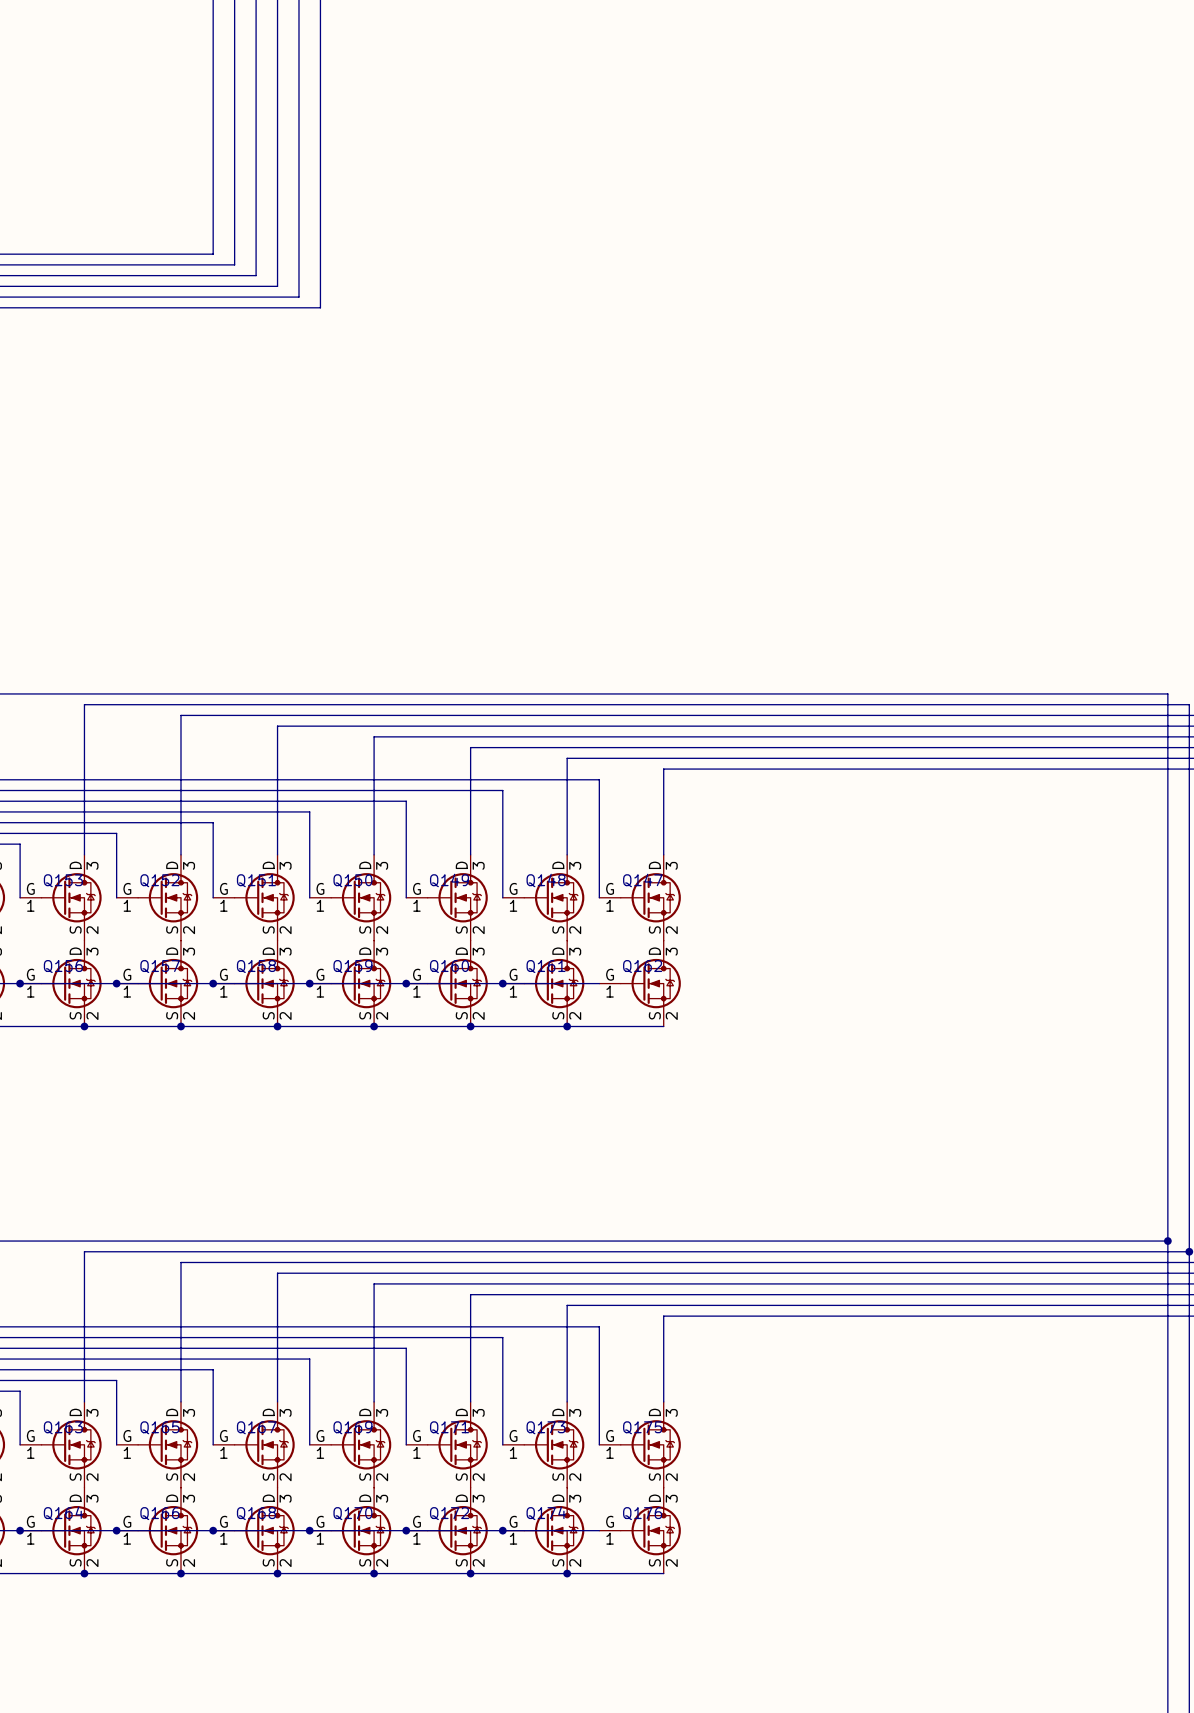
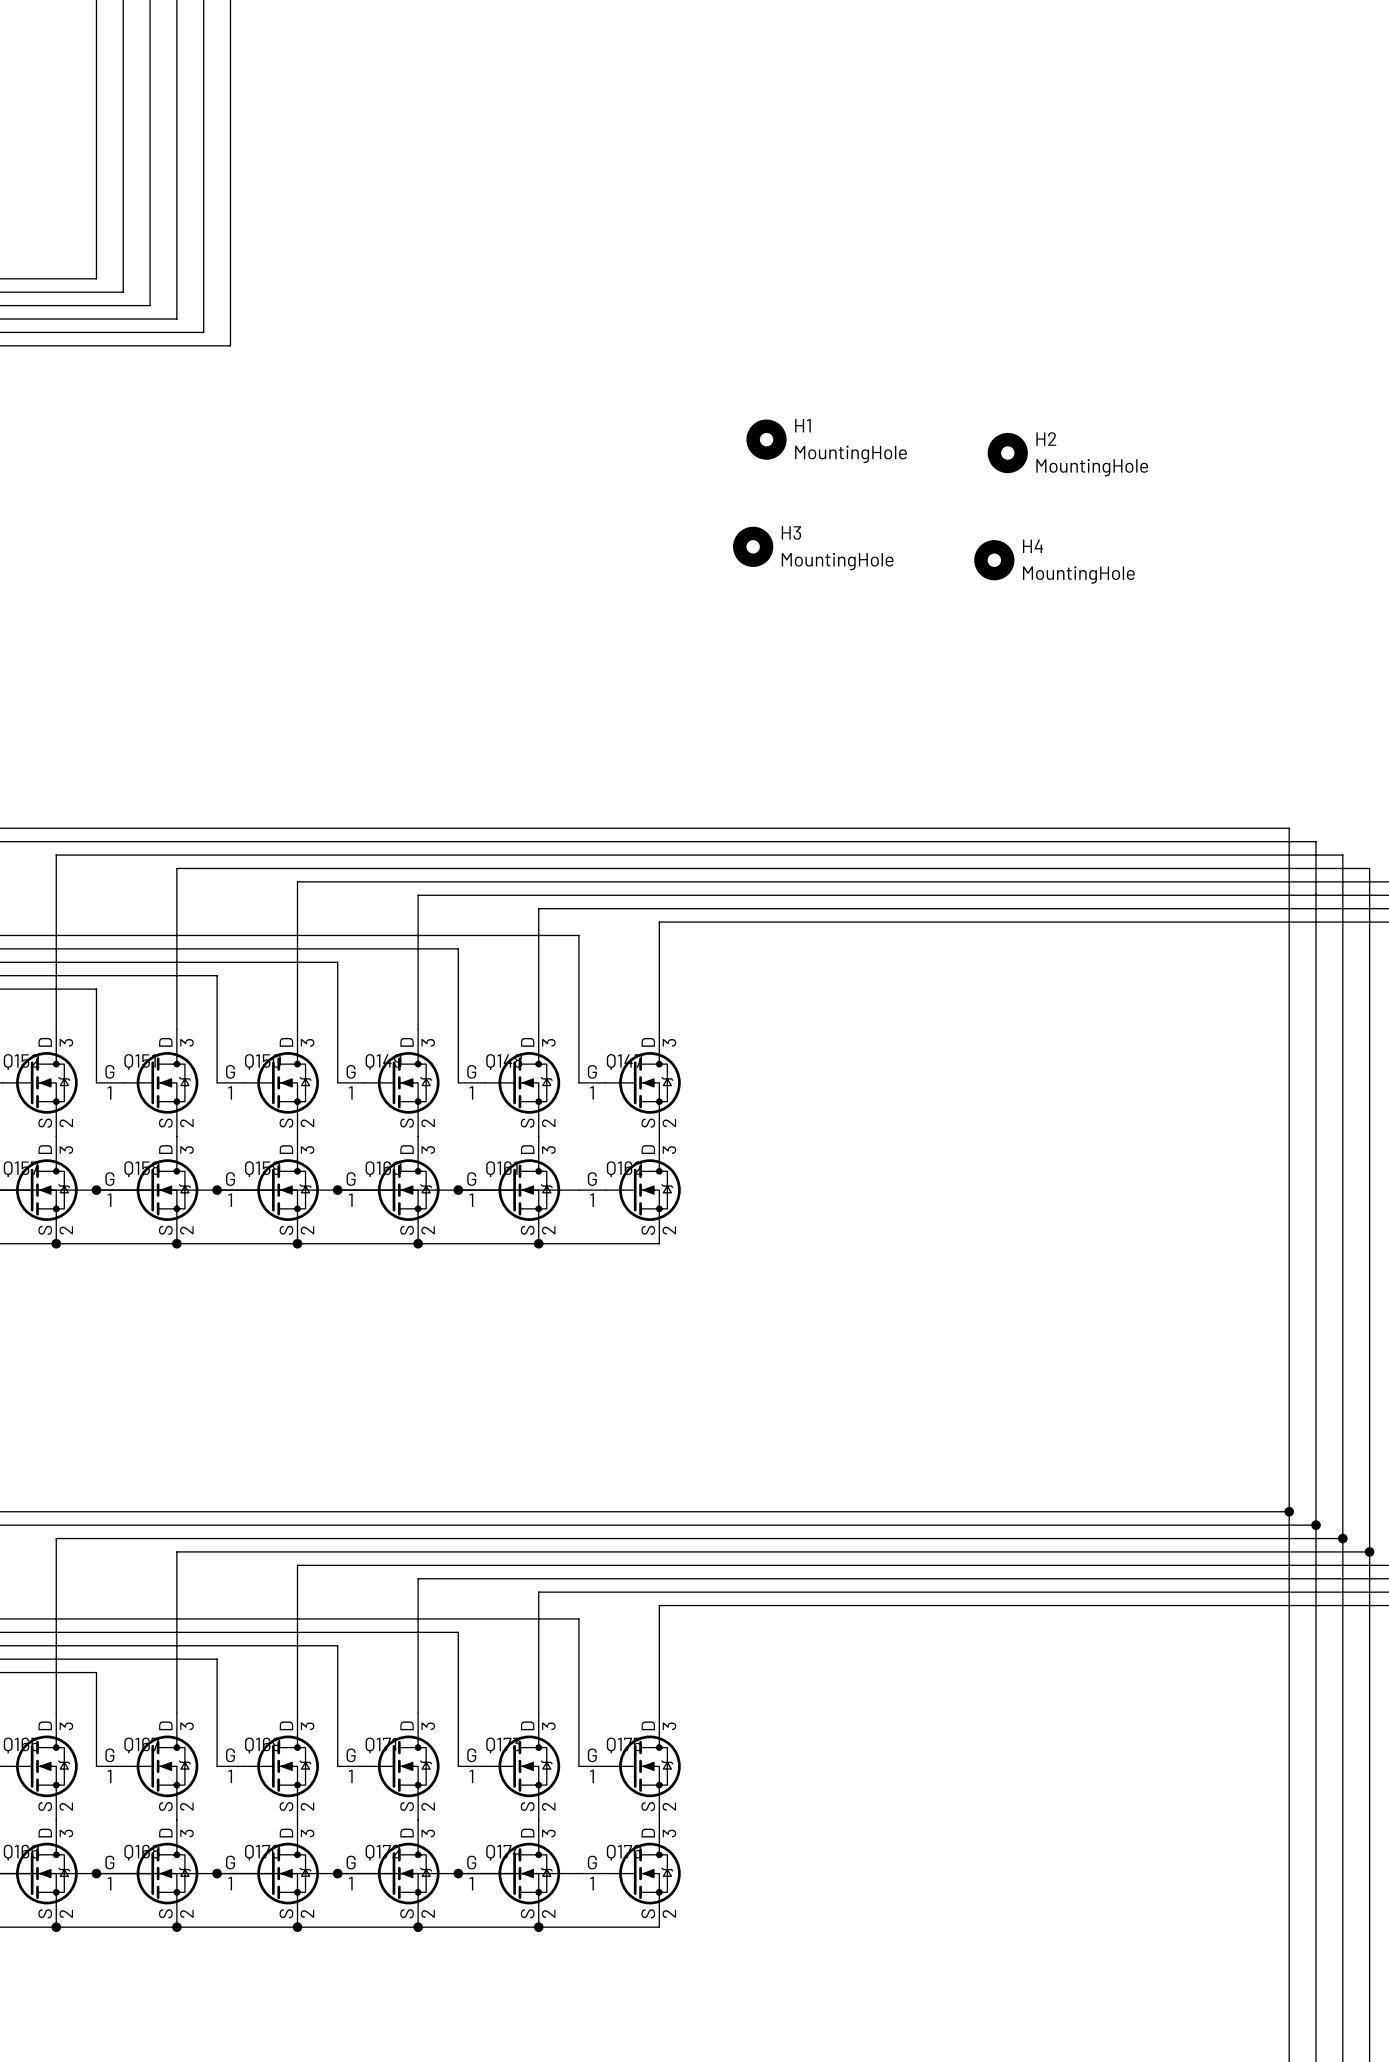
H1: none -> MountingHole (766, 439)
H2: none -> MountingHole (1007, 453)
H3: none -> MountingHole (753, 546)
H4: none -> MountingHole (994, 560)

